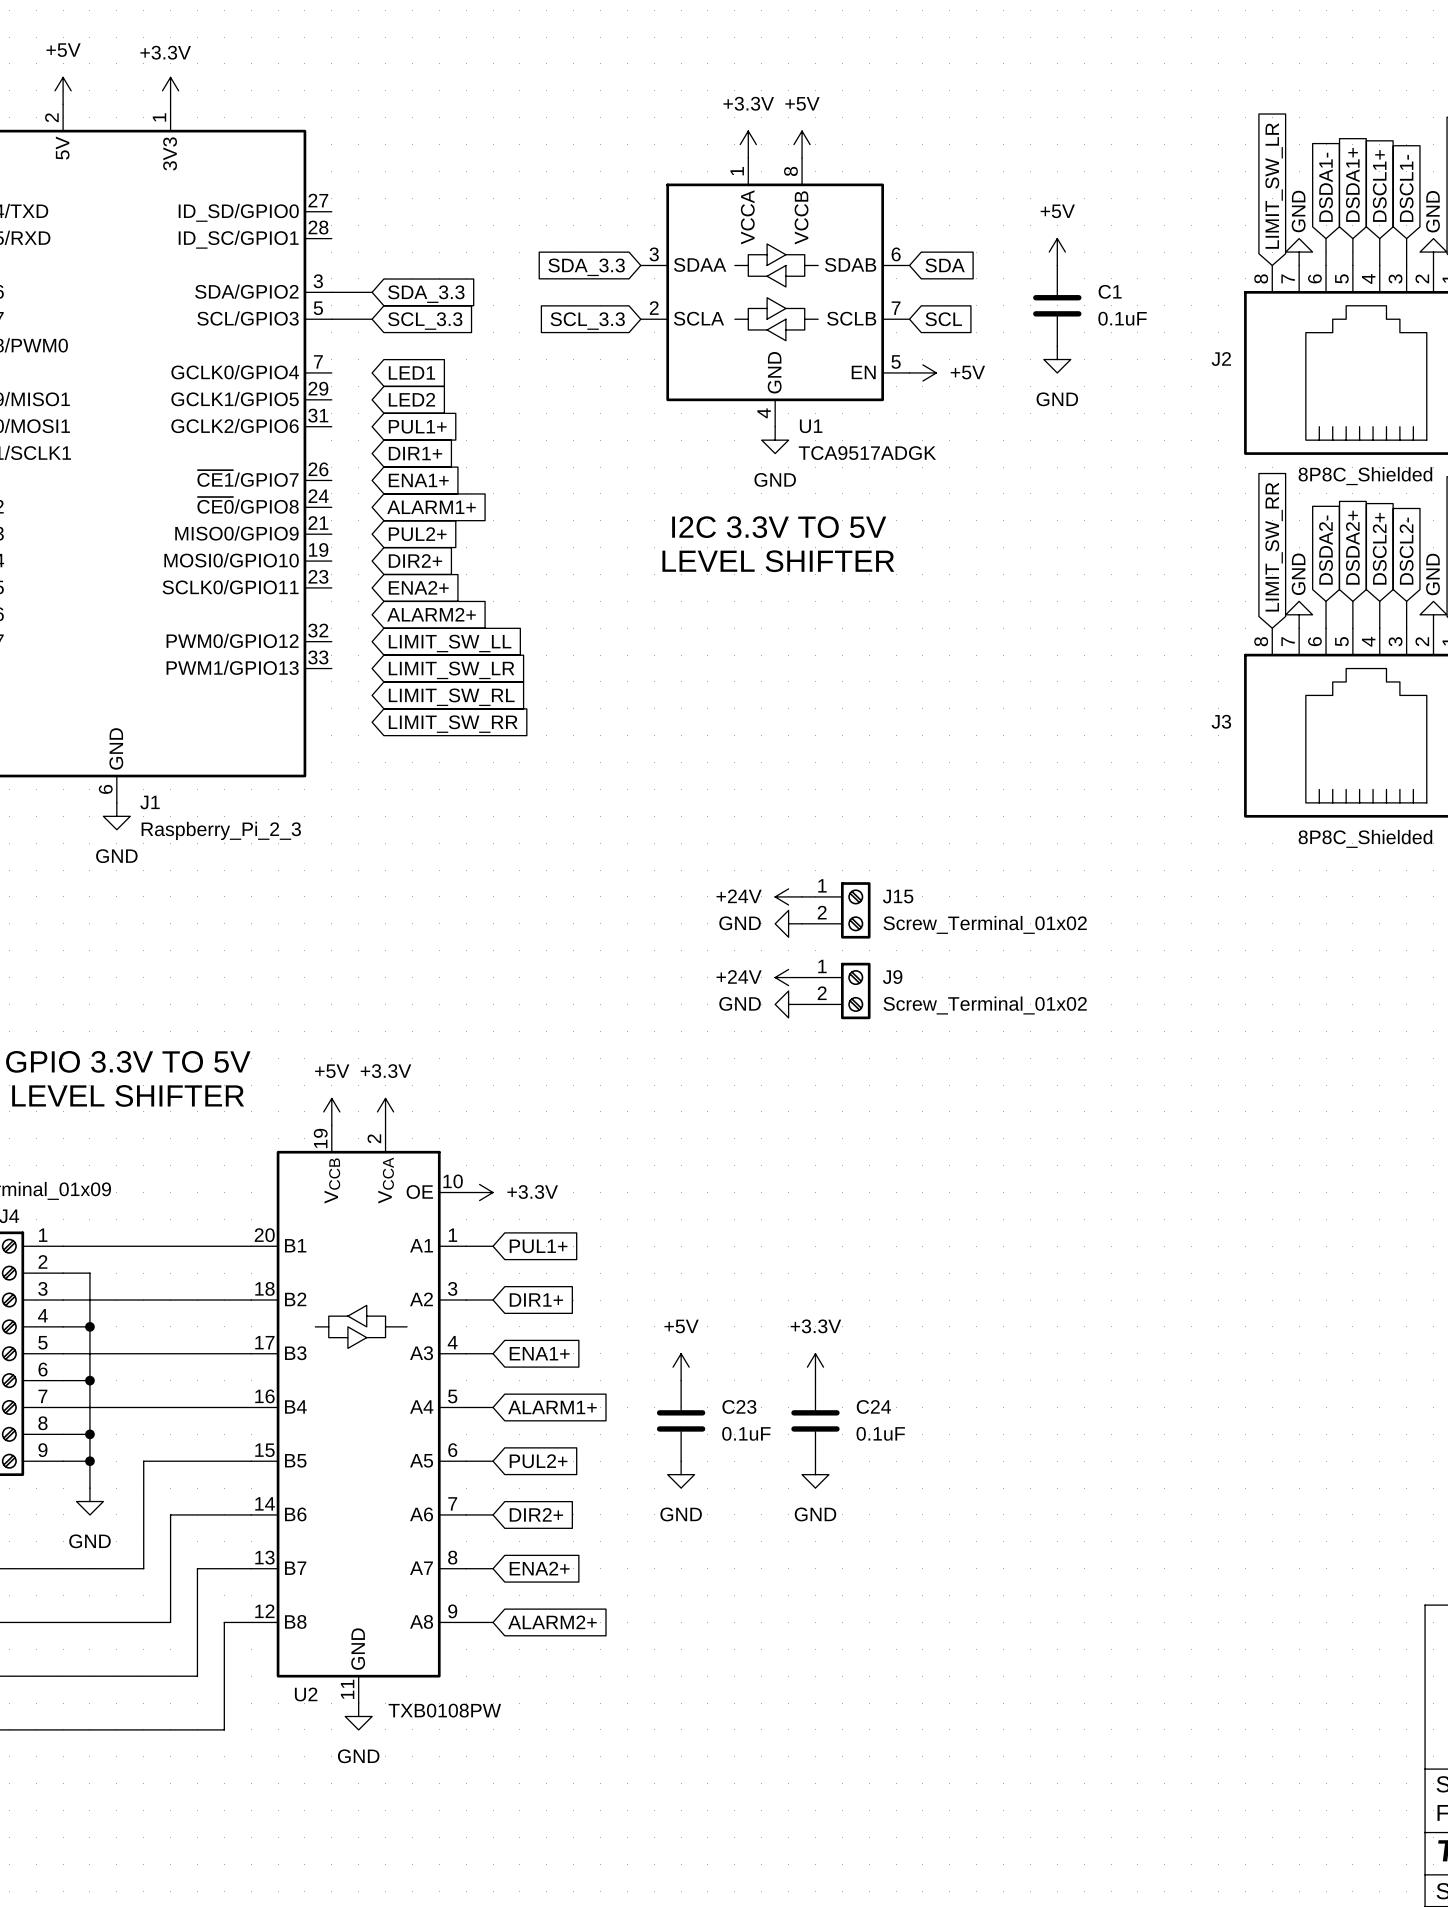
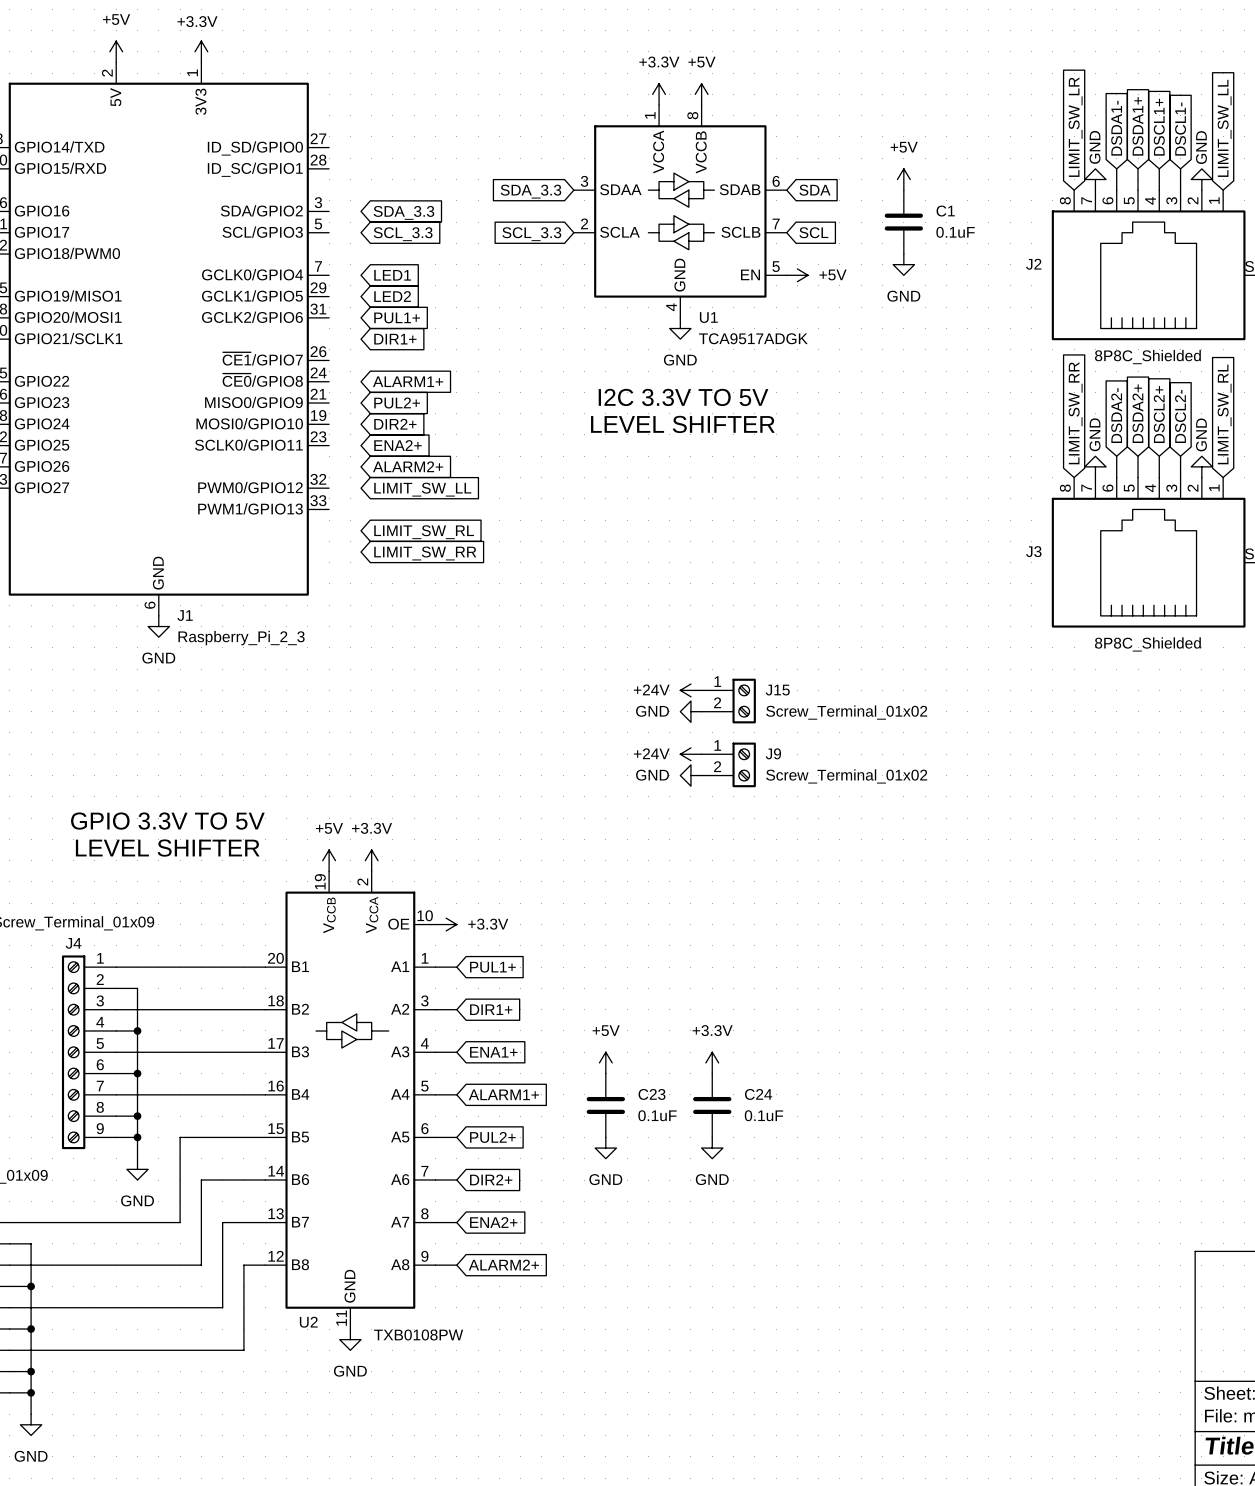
wire: (331, 292) (372, 292) -> none
wire: (331, 319) (372, 319) -> none
global label: ENA1+ (418, 480) -> none
global label: LIMIT_SW_LR (451, 670) -> none

